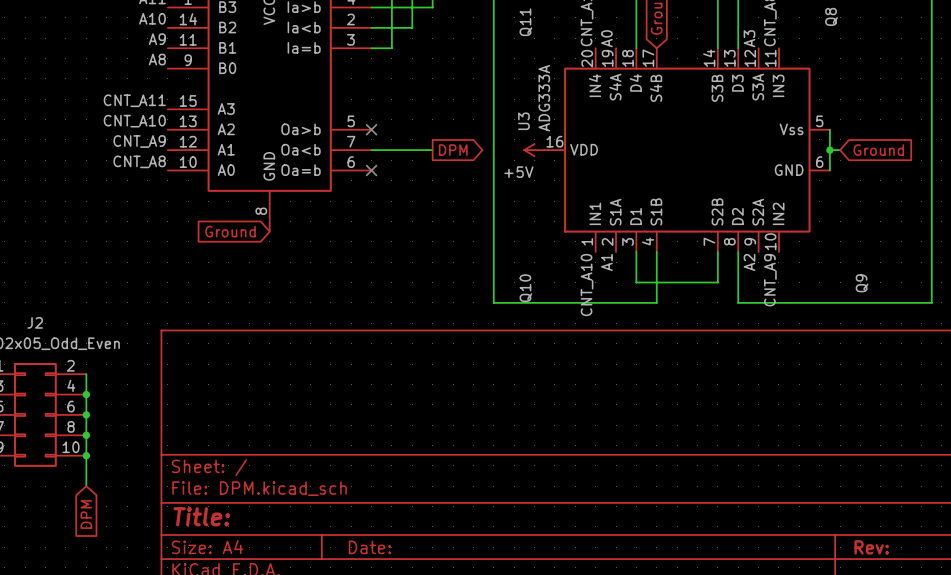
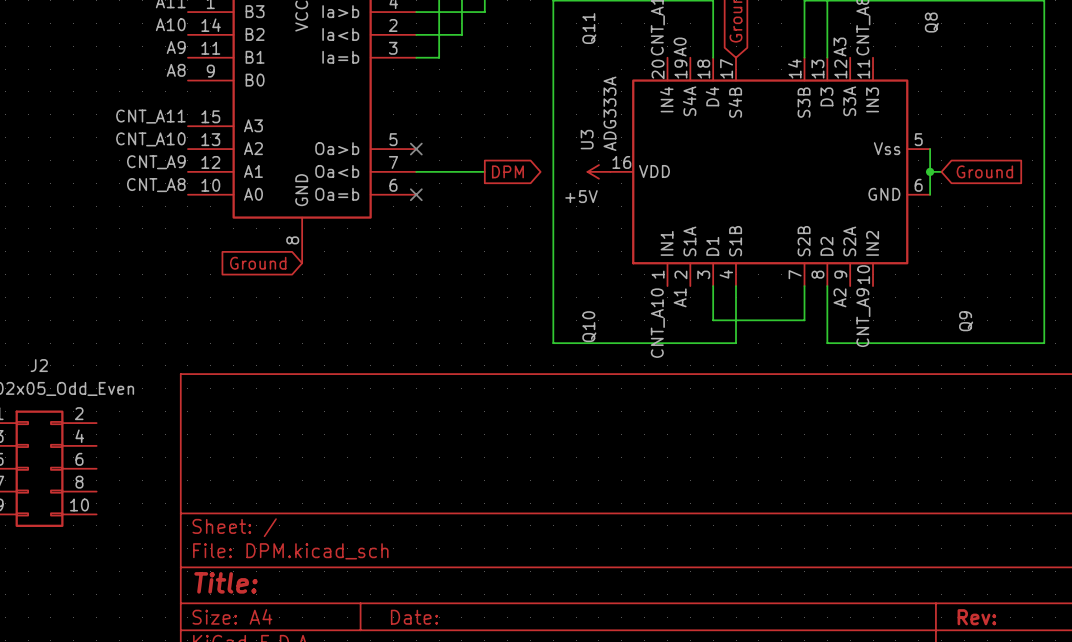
wire: (86, 374) (86, 486) -> none
junction: (86, 394) -> none
junction: (86, 414) -> none
junction: (86, 435) -> none
junction: (86, 455) -> none
global label: DPM (86, 514) -> none

